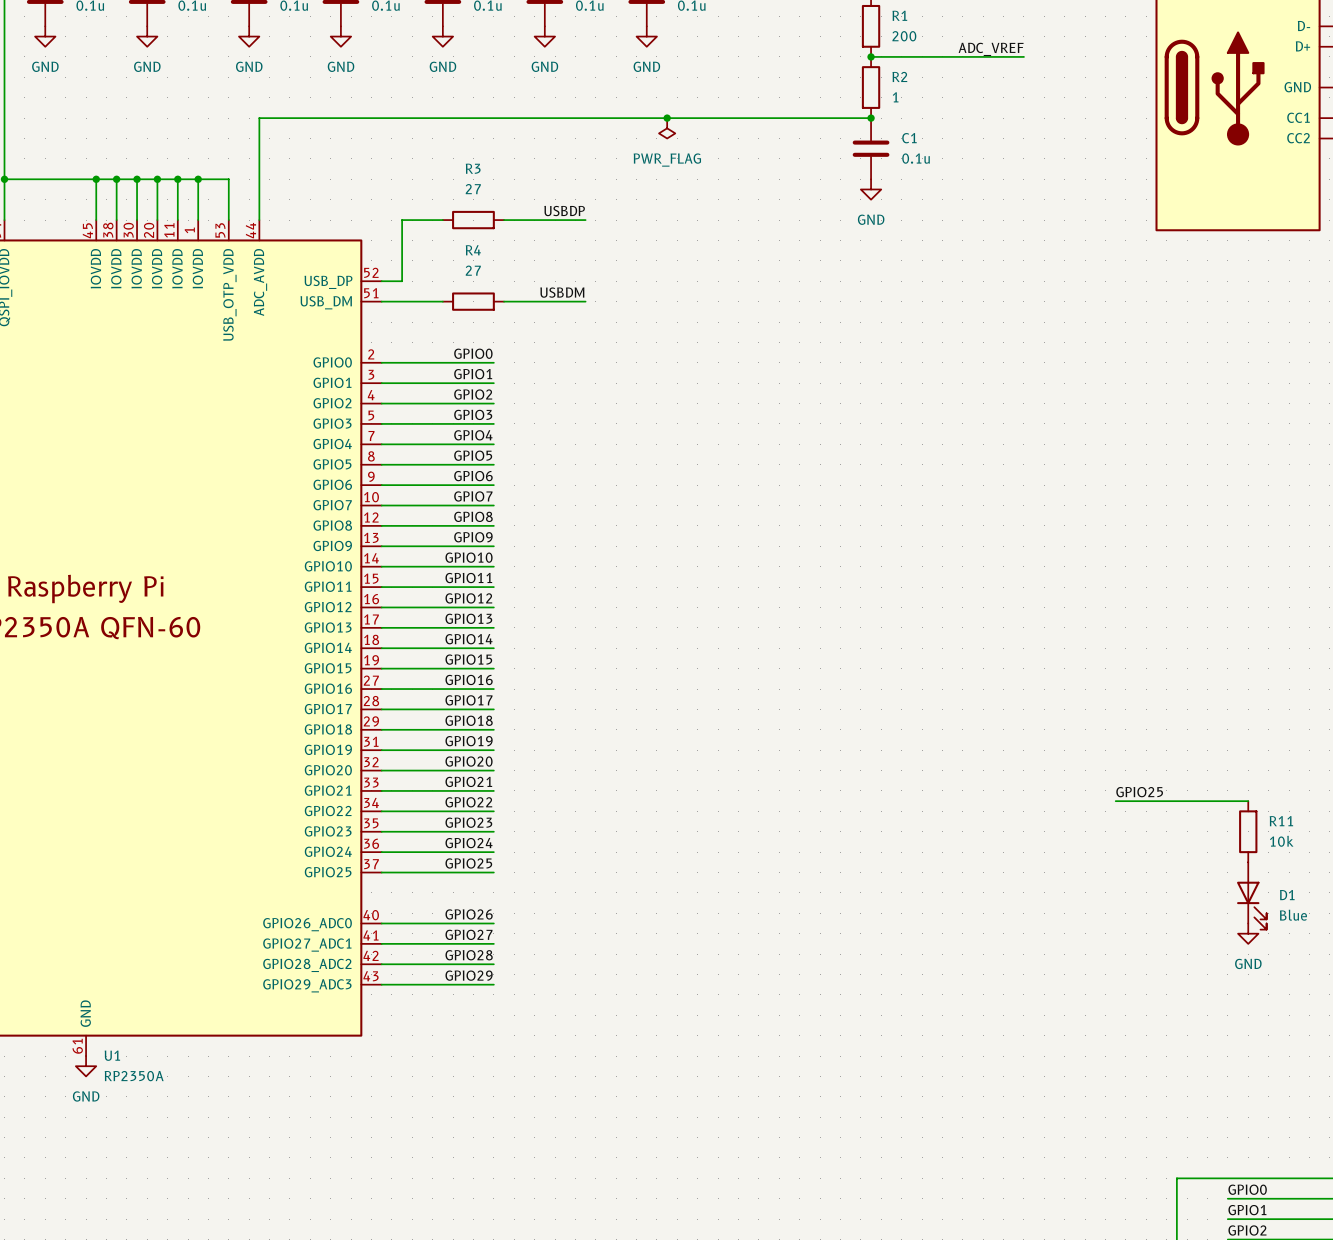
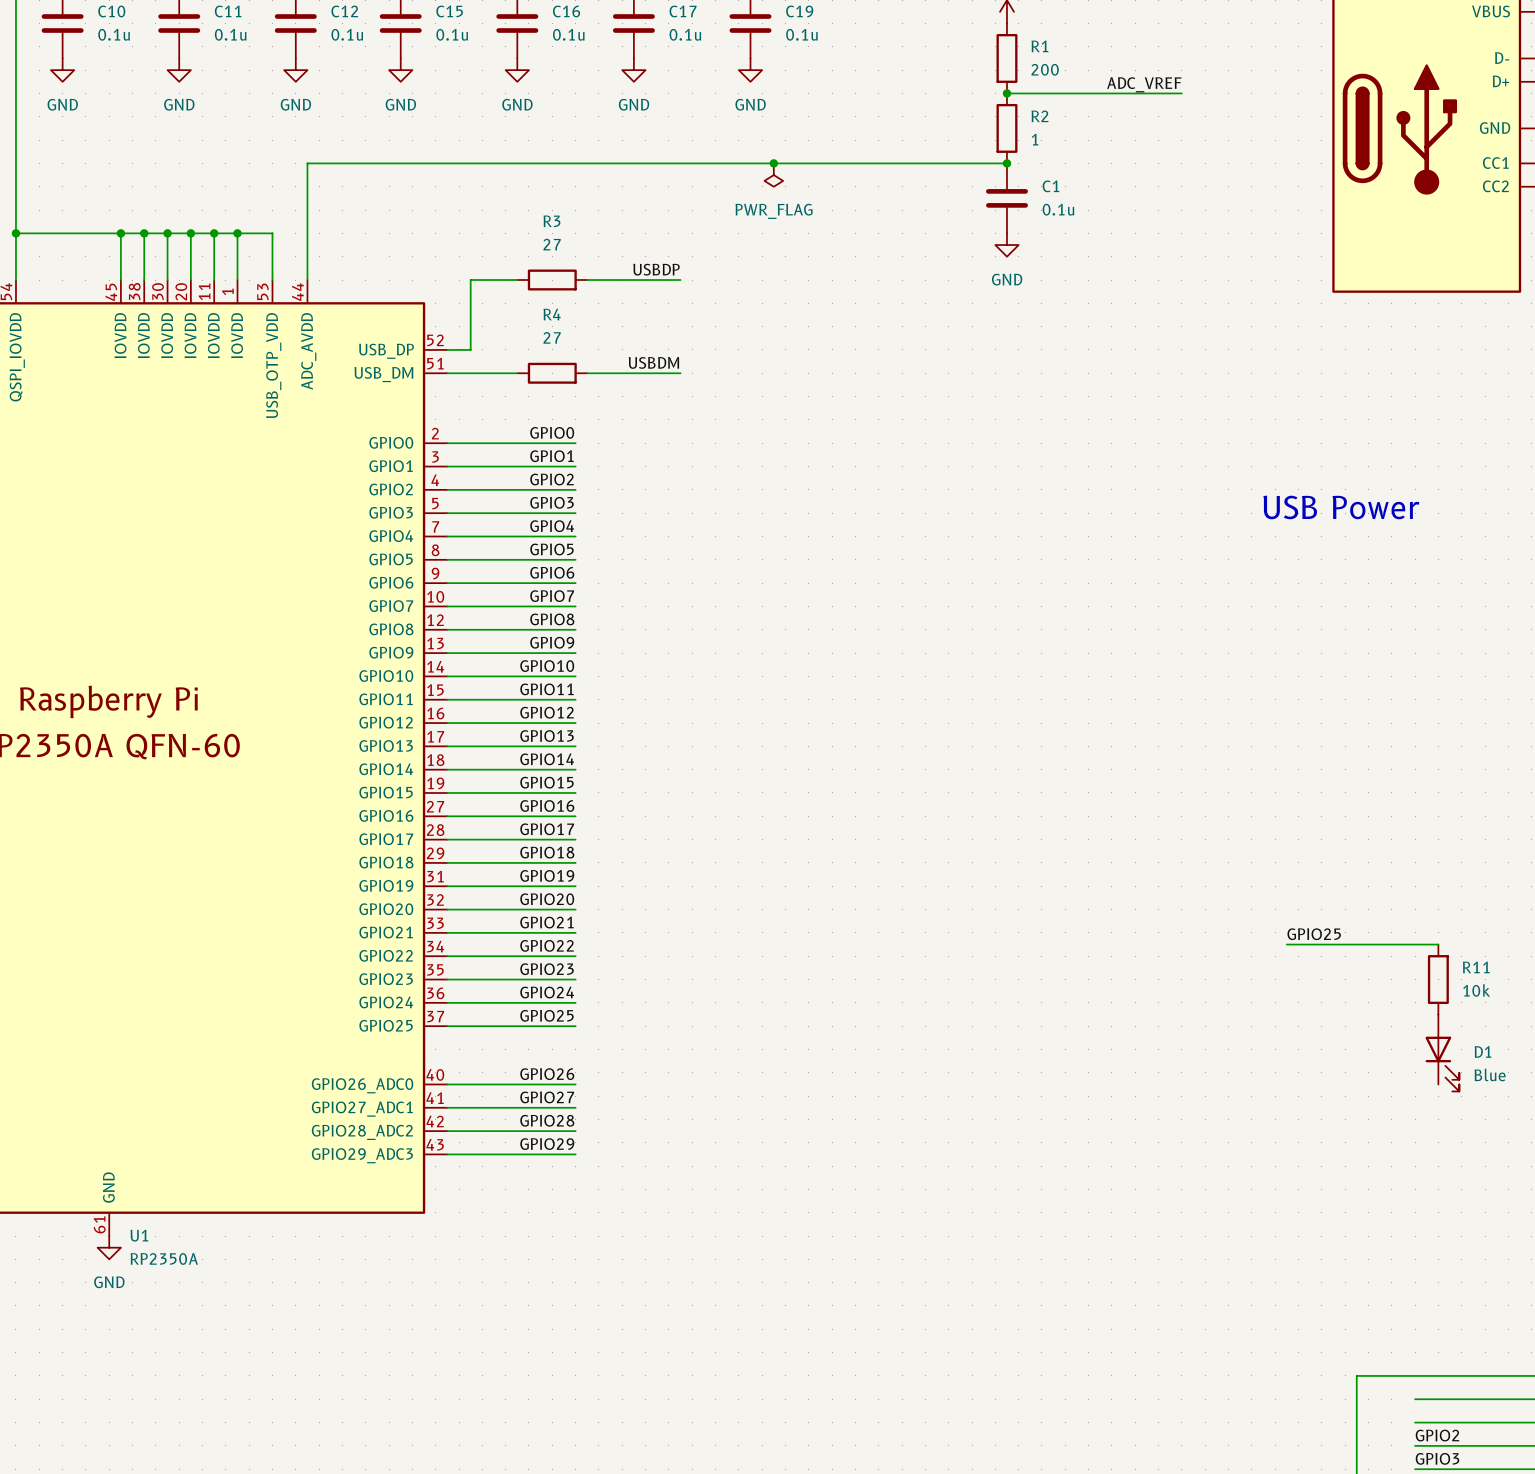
text: none -> USB Power (1341, 507)
power symbol: GND (1248, 933) -> none
label: GPIO0 (1247, 1189) -> none
label: GPIO1 (1247, 1210) -> none

